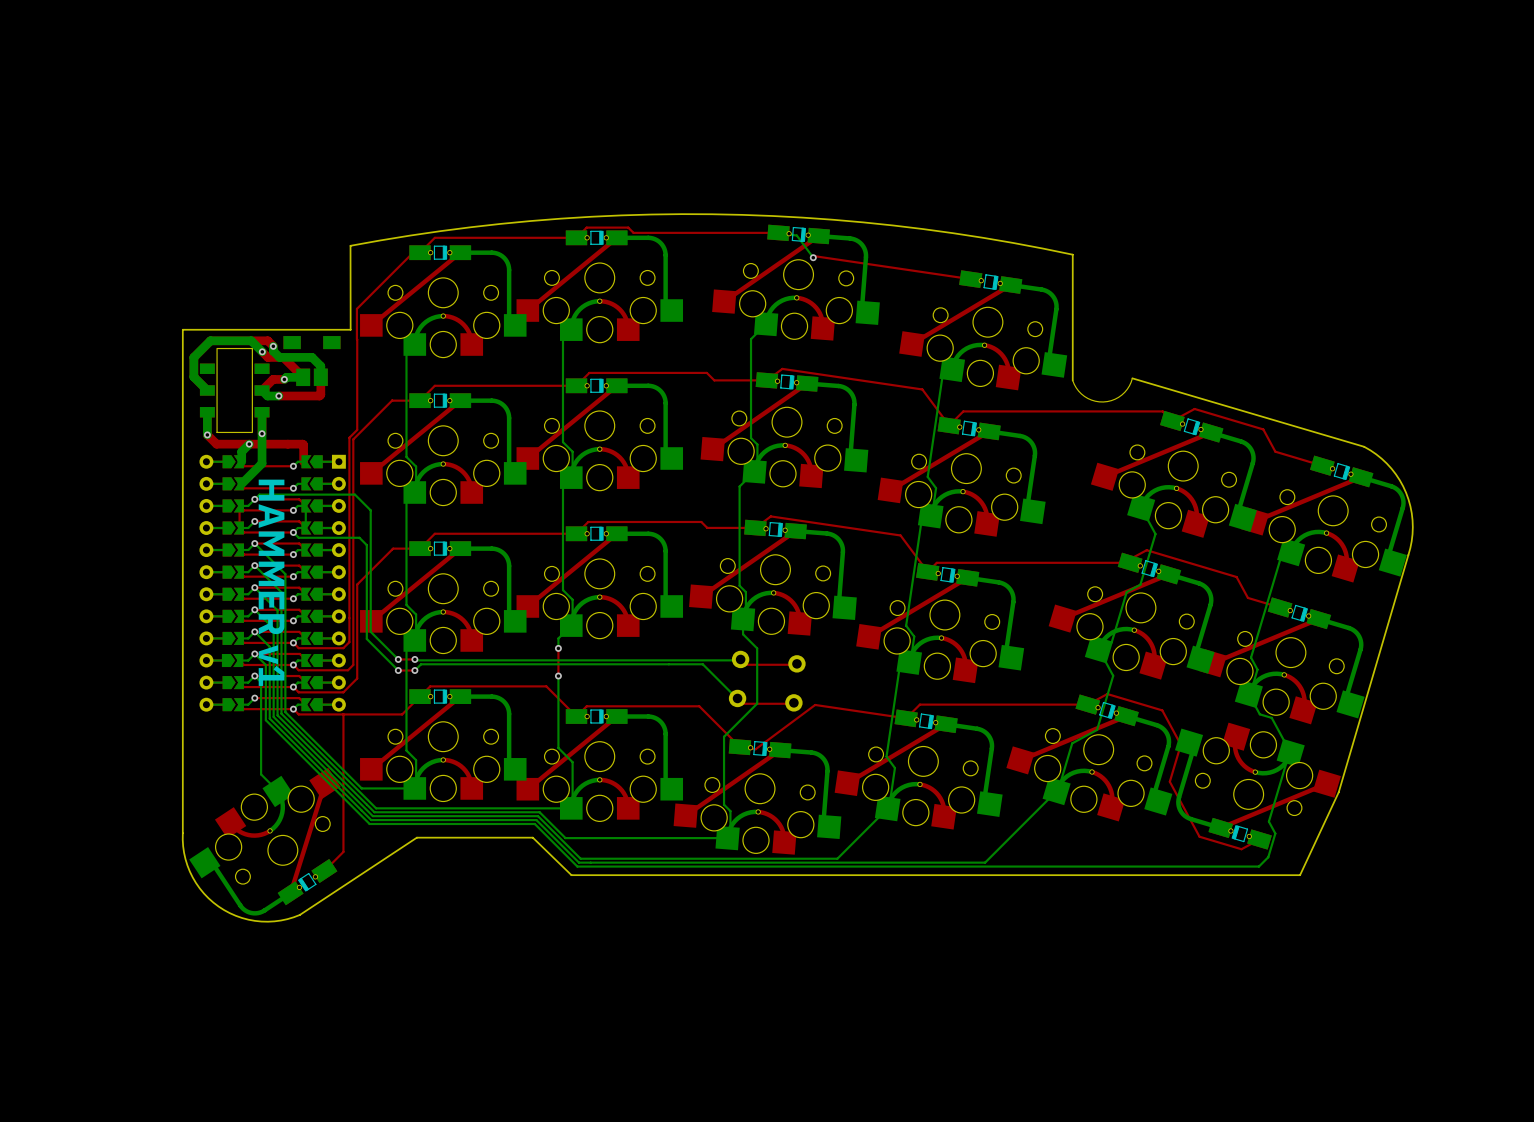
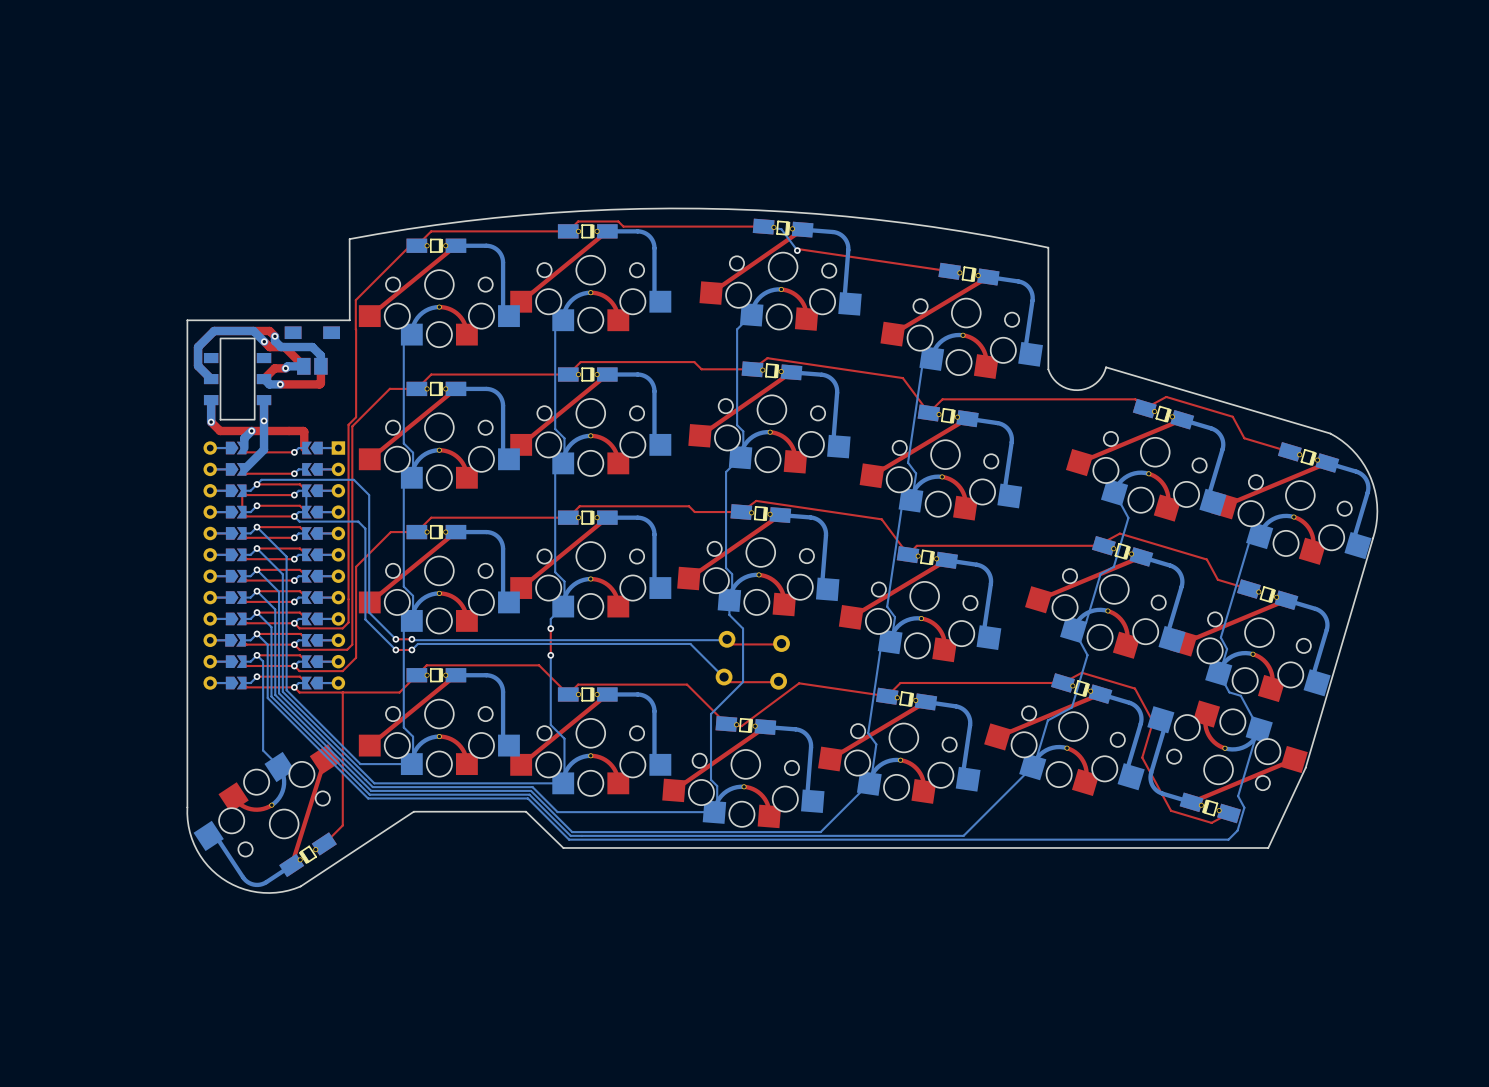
drawing: [258, 479, 285, 635] -> none
drawing: [258, 645, 285, 686] -> none

